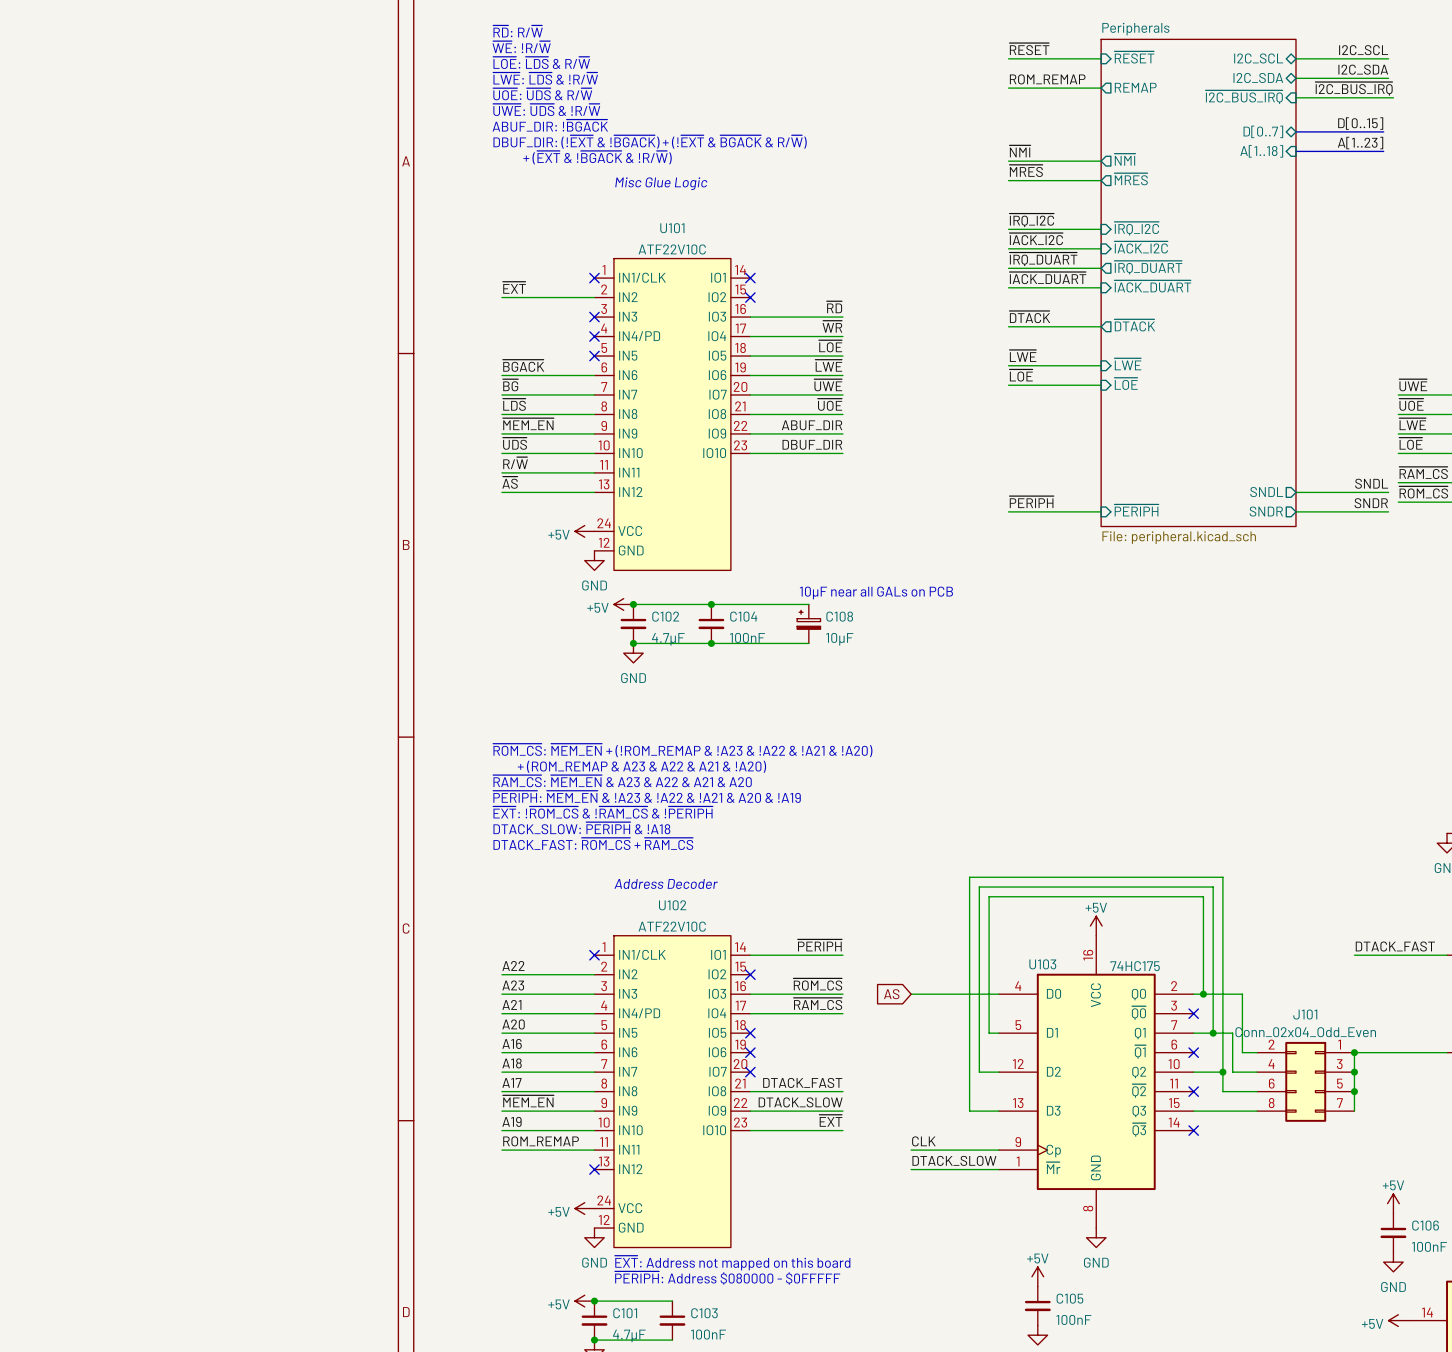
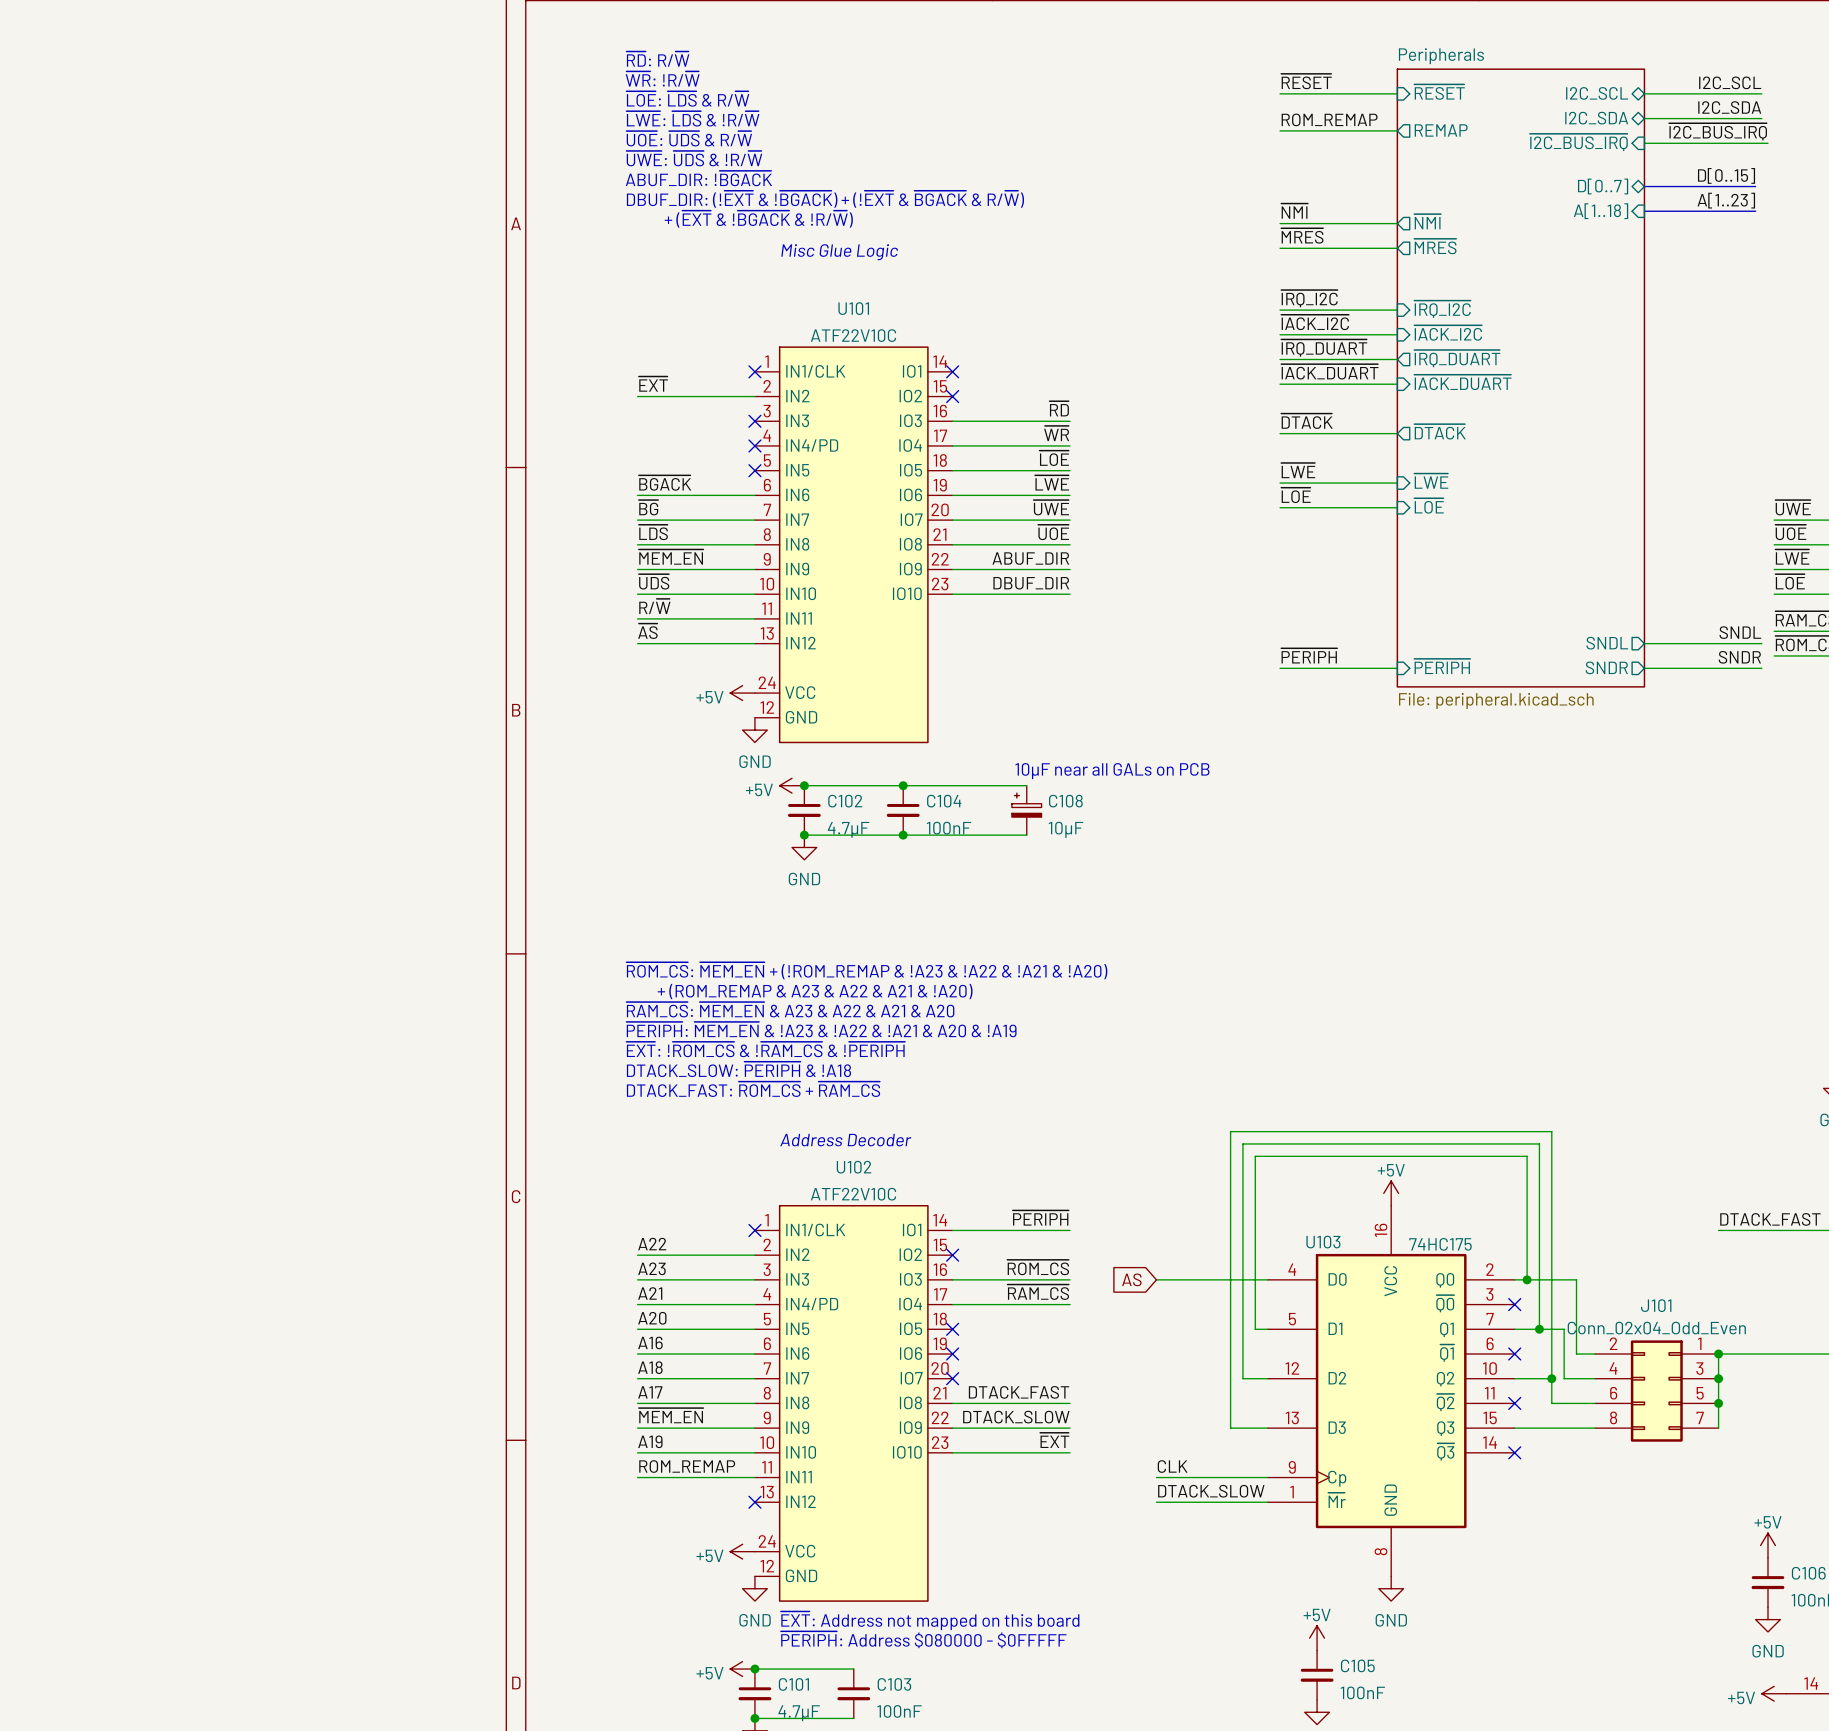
text: ~{WE}: !R/~{W} (521, 47) -> ~{WR}: !R/~{W} (662, 79)

